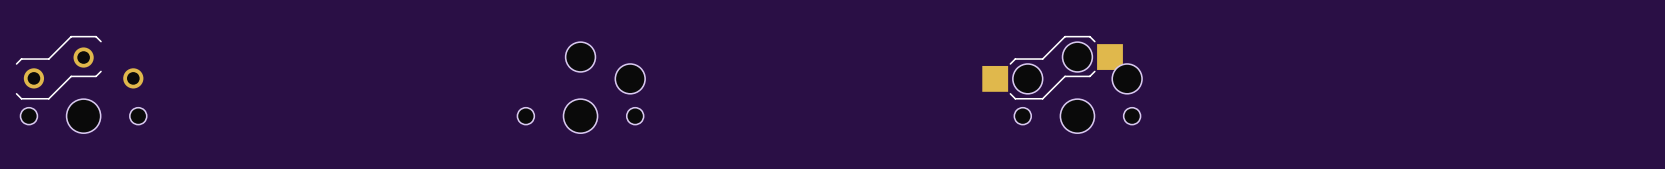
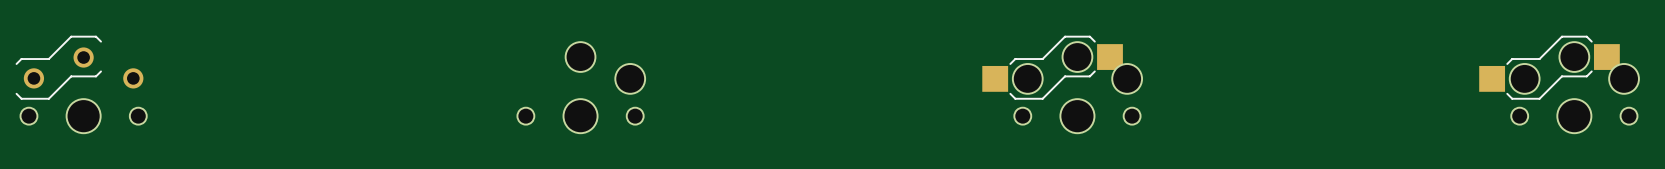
part: none -> (1559, 84)

